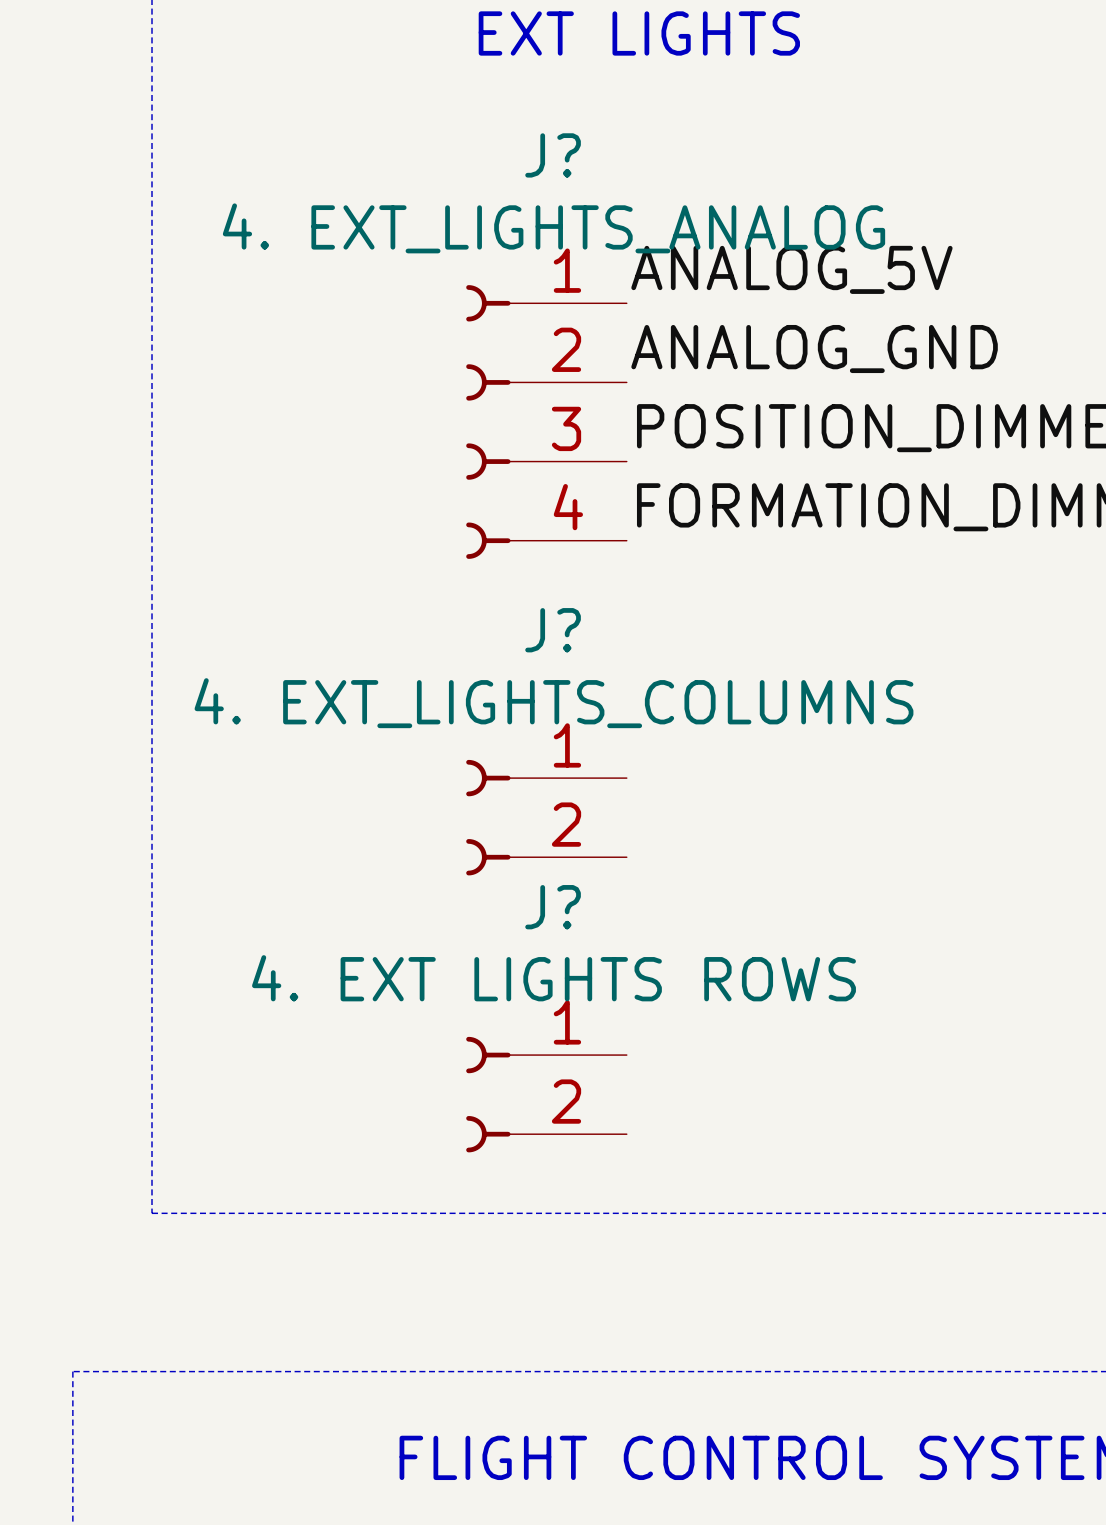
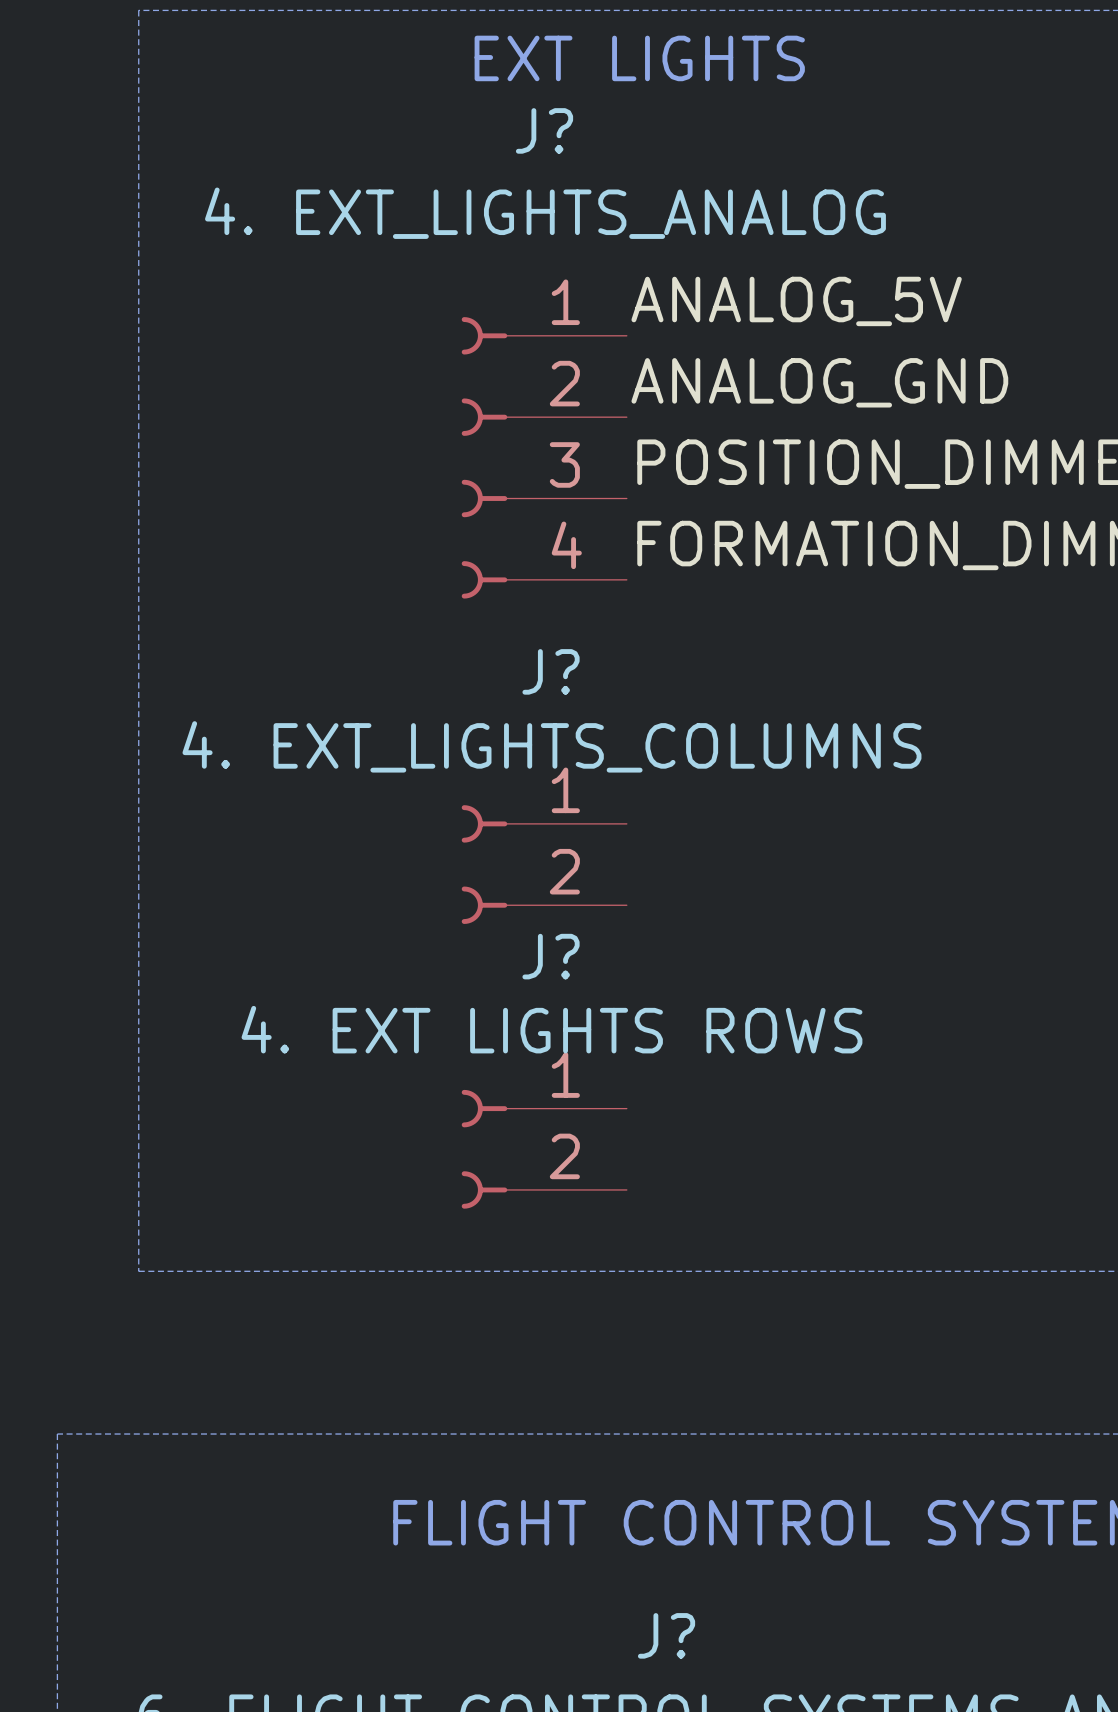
J? name position: J? (553, 155) -> J? (544, 130)
J? value position: 4. EXT_LIGHTS_ANALOG (553, 228) -> 4. EXT_LIGHTS_ANALOG (545, 213)

